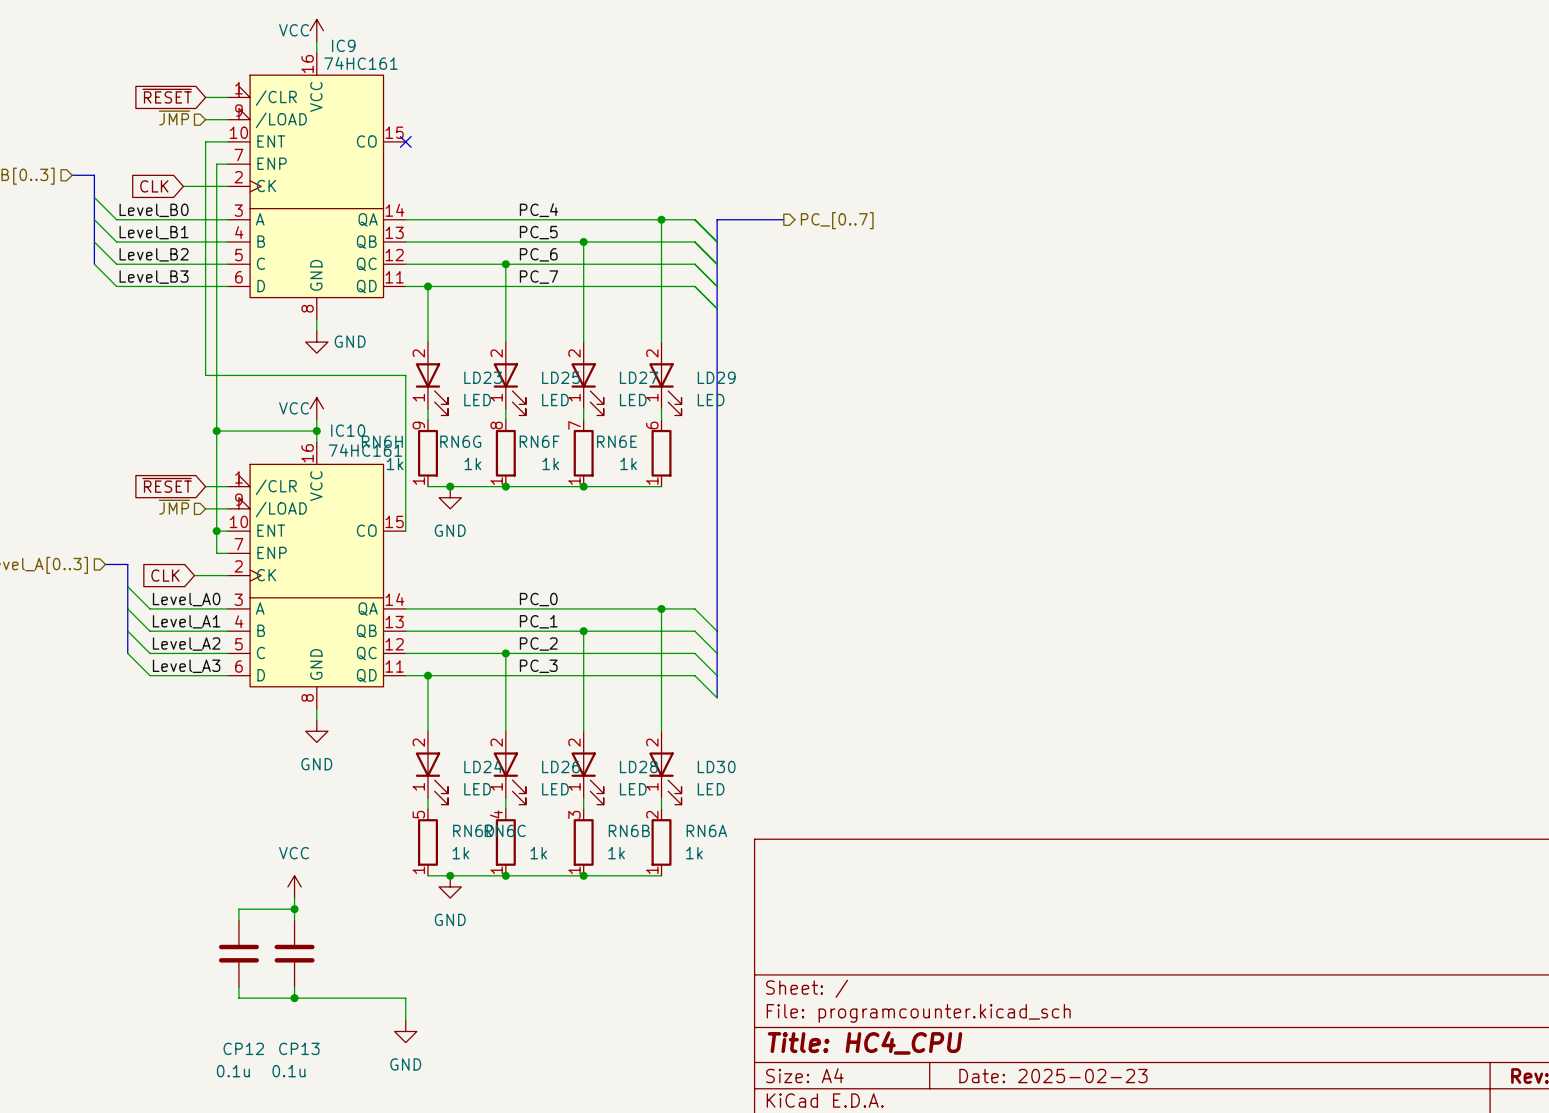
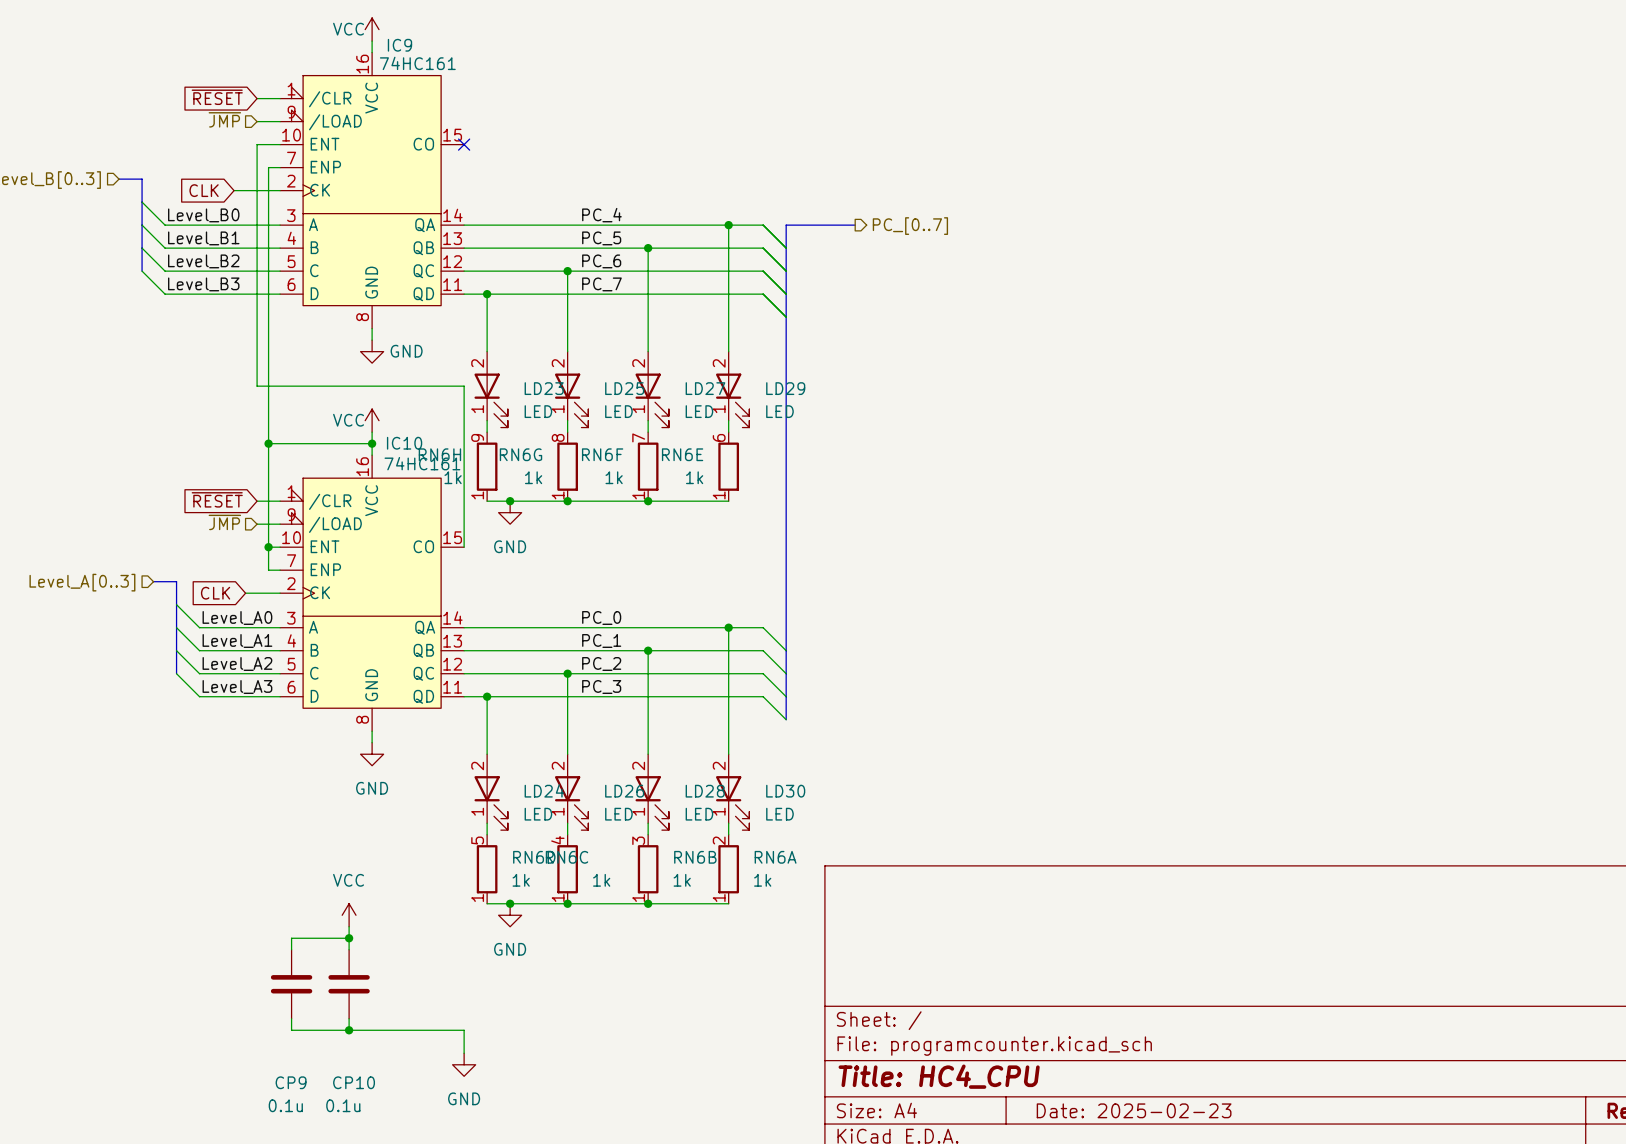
CP12 name: CP12 (243, 1048) -> CP9 (291, 1082)
CP13 name: CP13 (299, 1048) -> CP10 (354, 1082)

